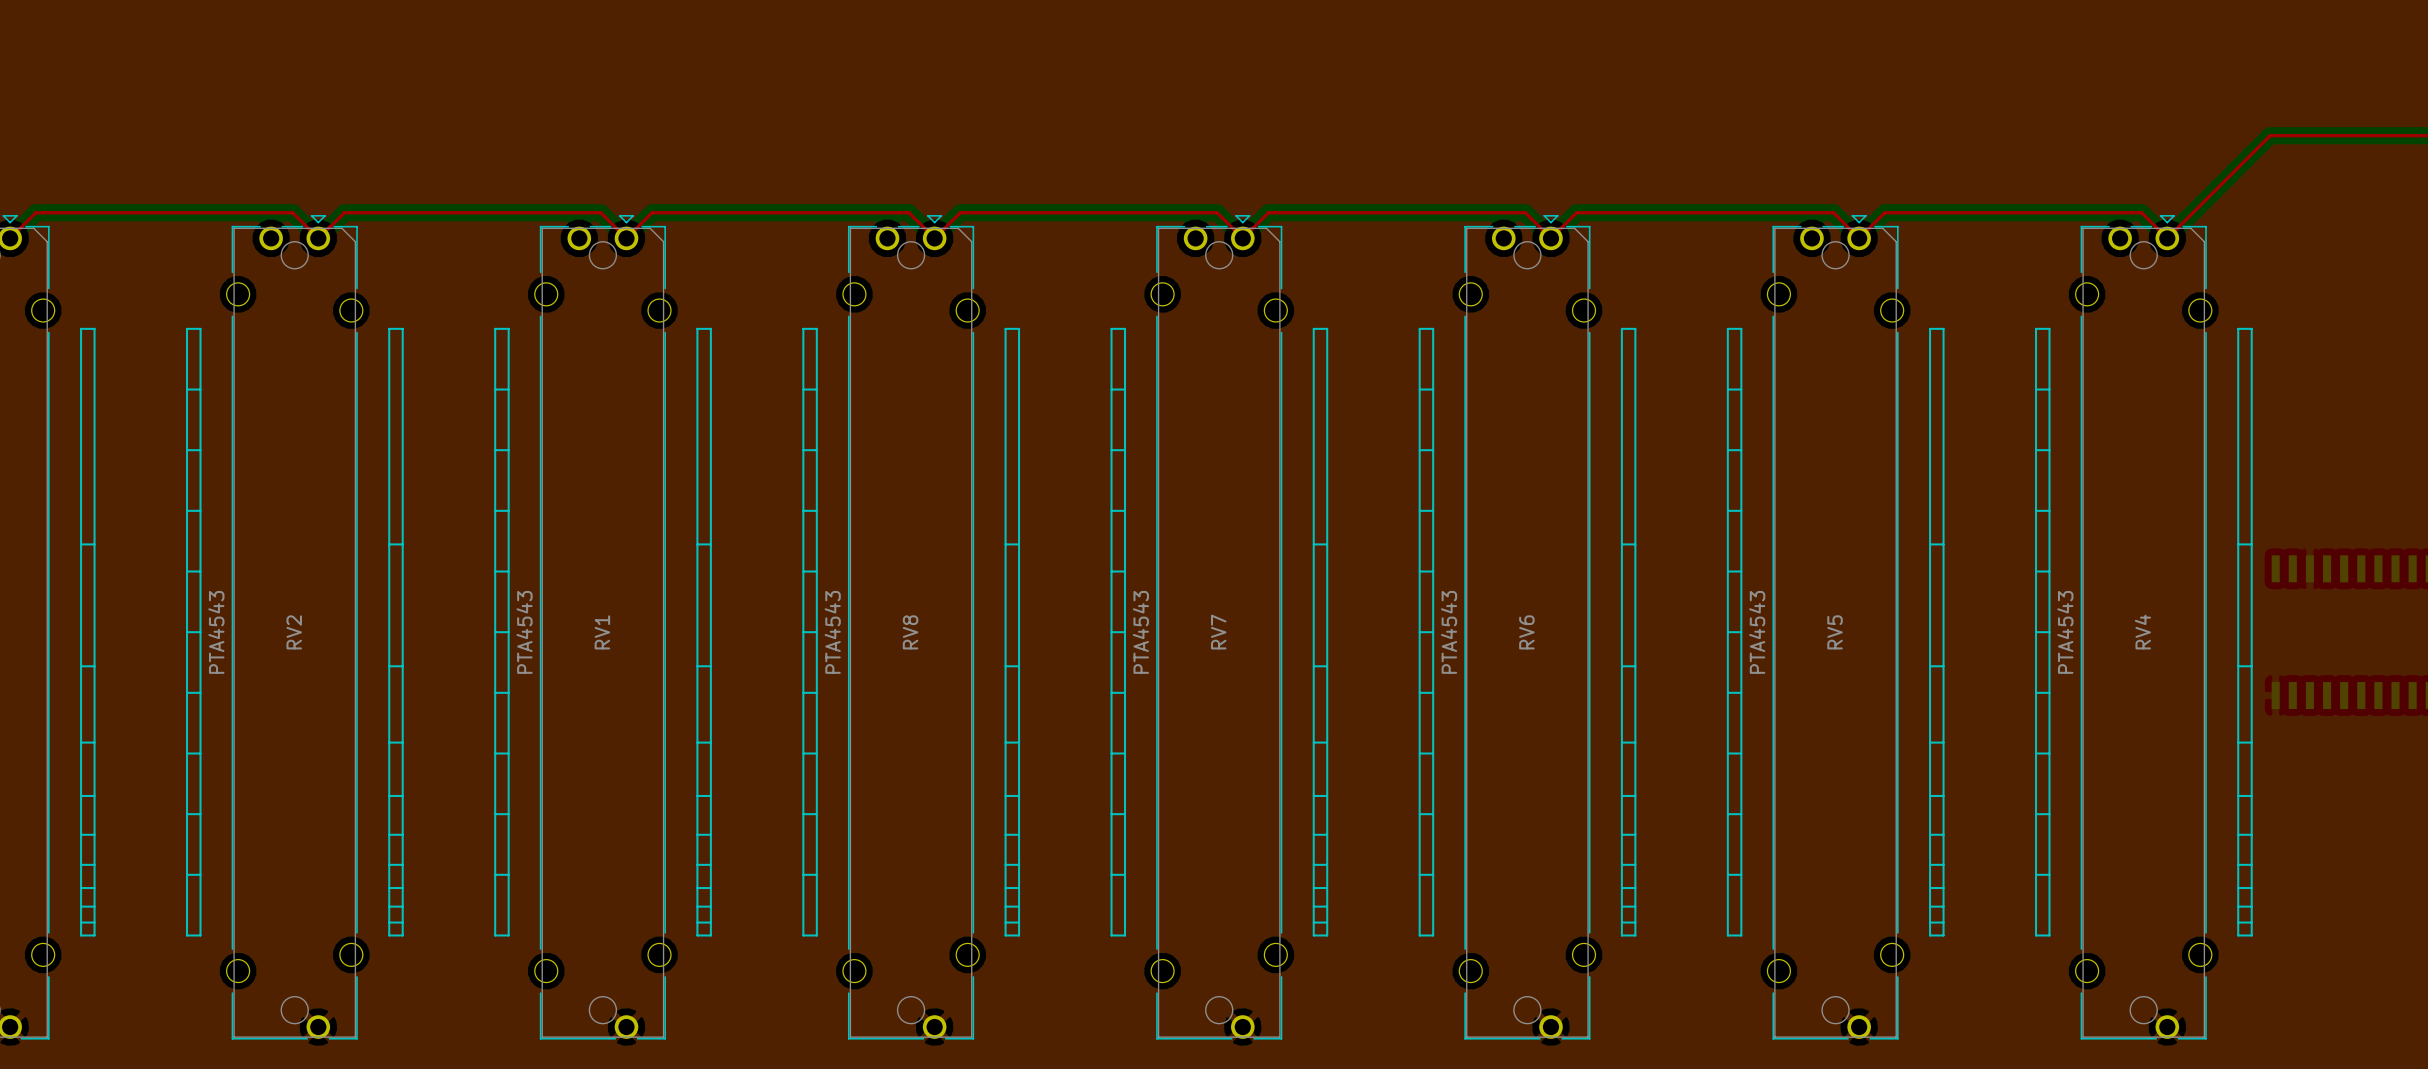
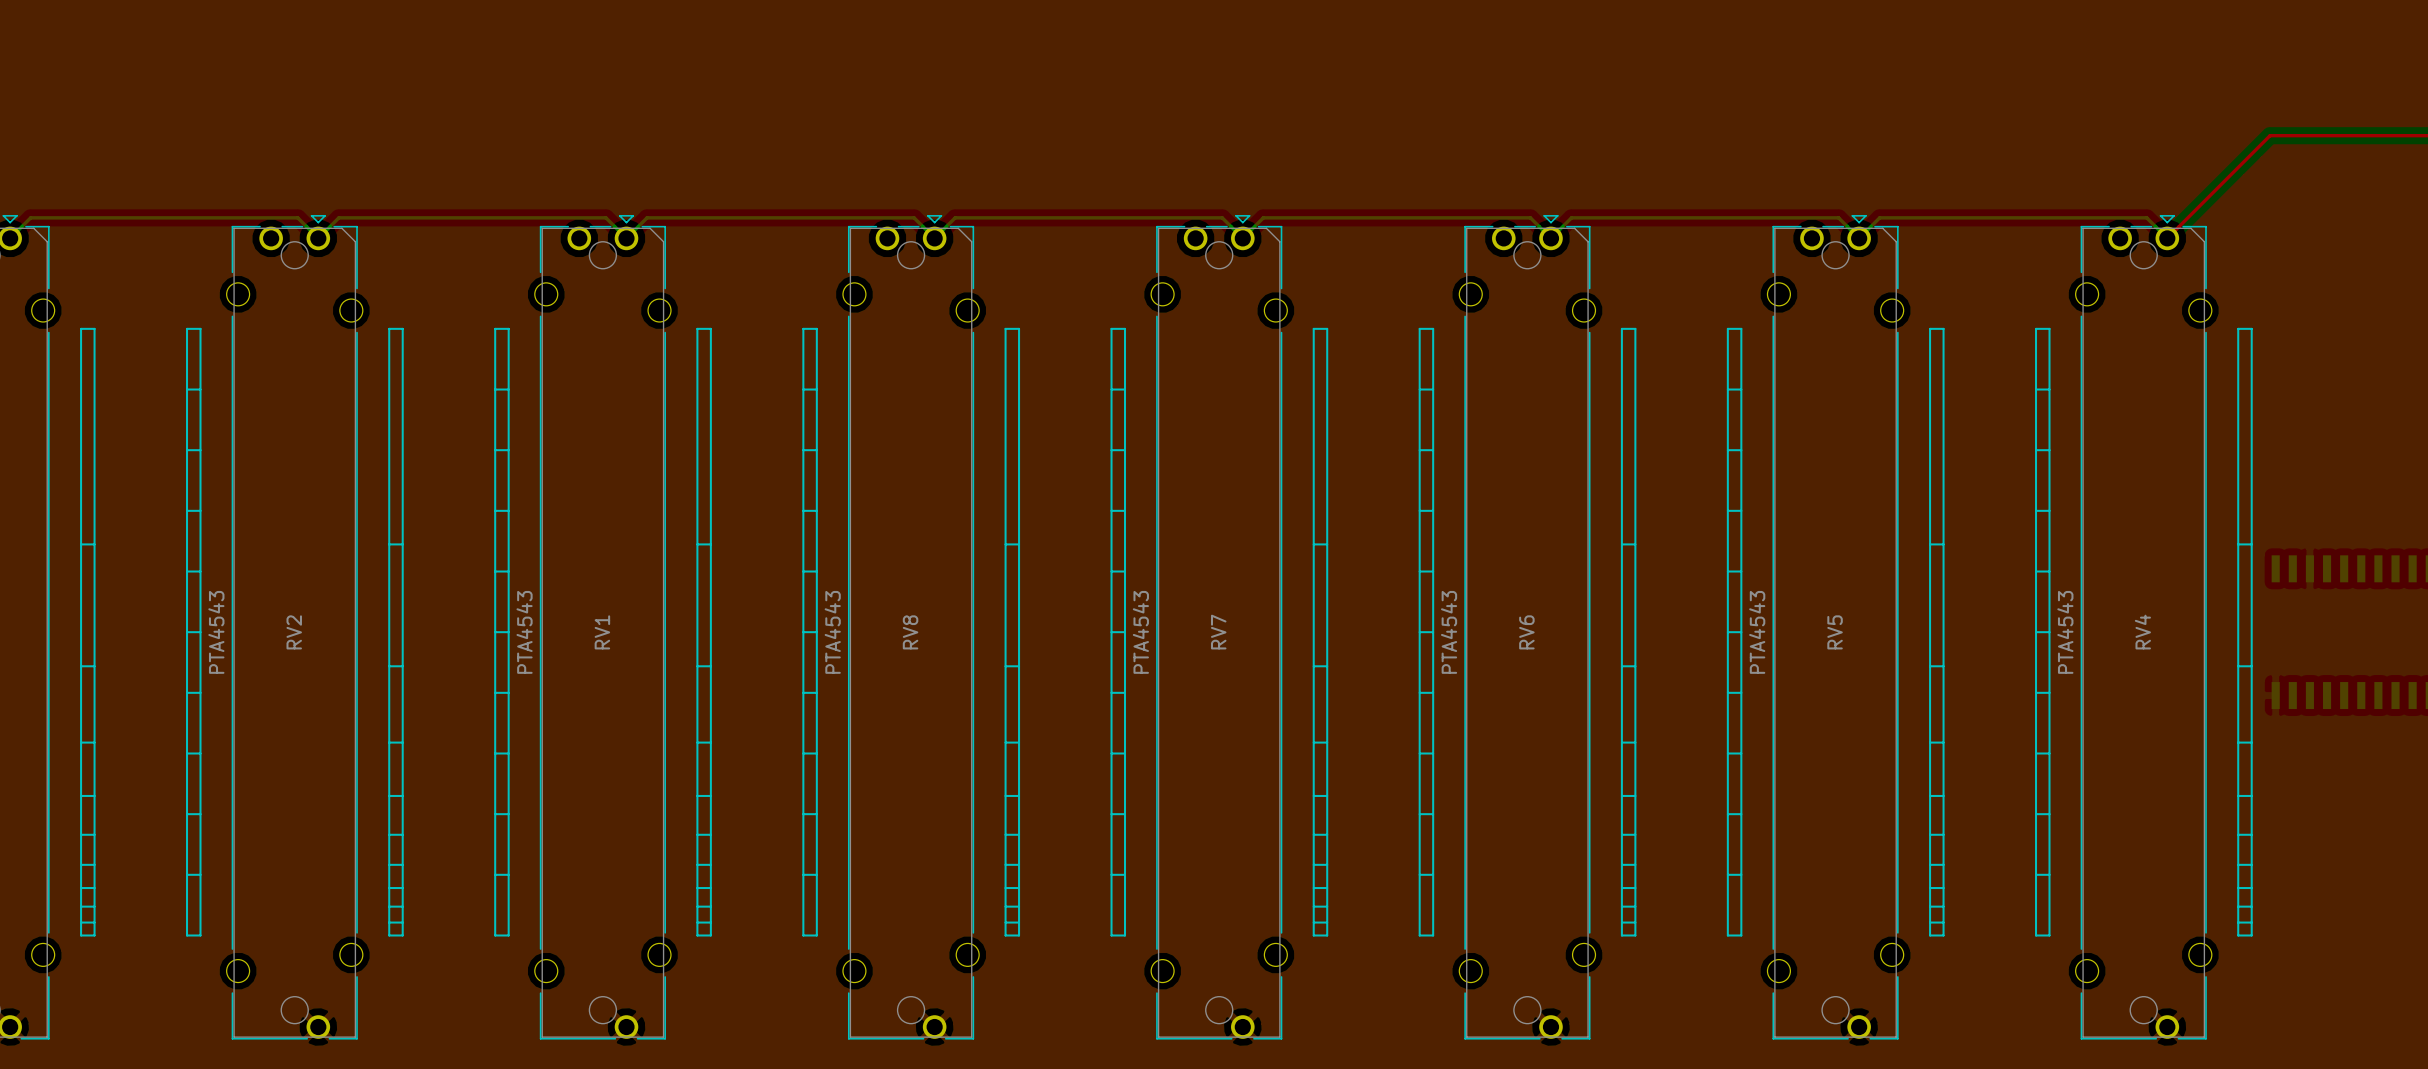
top track: (10, 238) (35, 212) (292, 212) (318, 238) (344, 212) (600, 212) (626, 238) (652, 212) (908, 212) (934, 238) (960, 212) (1217, 212) (1242, 238) (1268, 212) (1525, 212) (1550, 238) (1576, 212) (1833, 212) (1859, 238) (1884, 212) (2141, 212) (2167, 238) -> none
bottom track: none -> (10, 238) (30, 217) (297, 217) (318, 238) (338, 217) (605, 217) (626, 238) (647, 217) (914, 217) (934, 238) (955, 217) (1222, 217) (1242, 238) (1263, 217) (1530, 217) (1550, 238) (1571, 217) (1838, 217) (1859, 238) (1879, 217) (2146, 217) (2167, 238)

